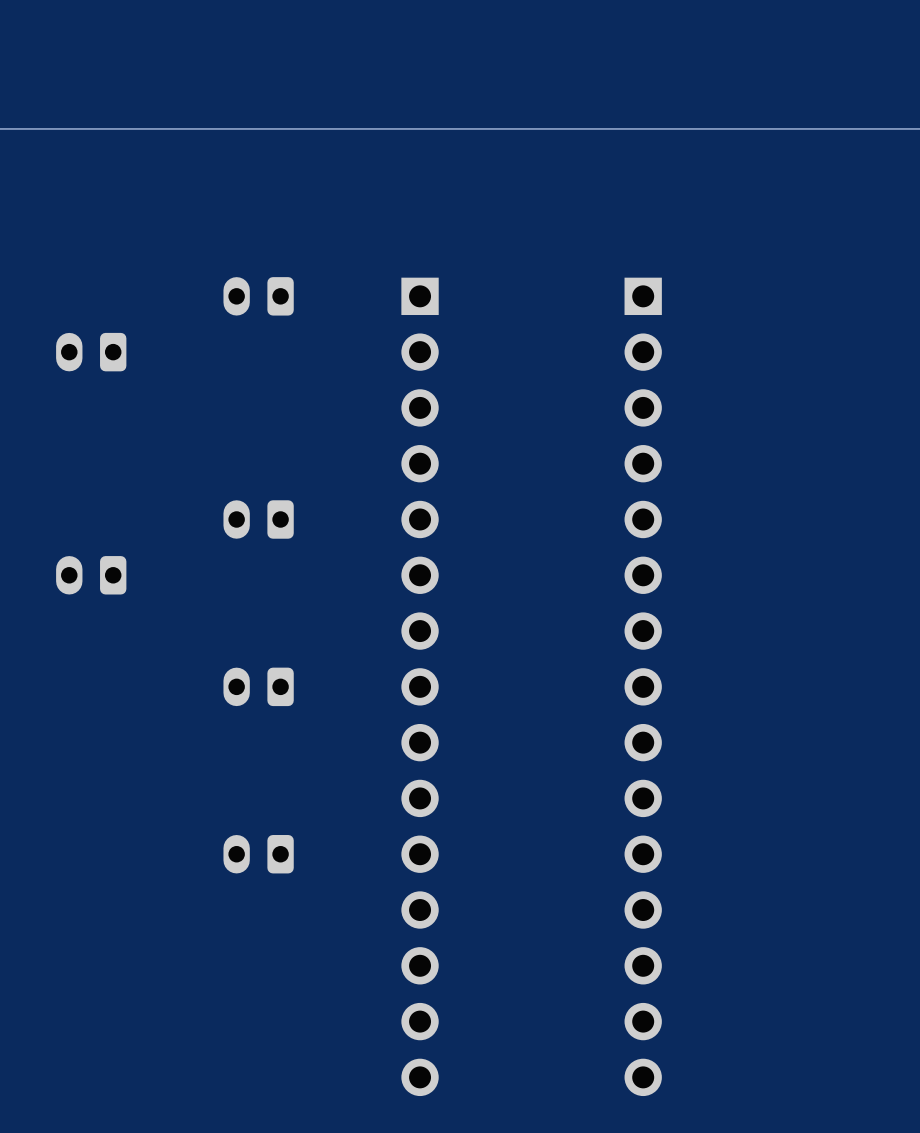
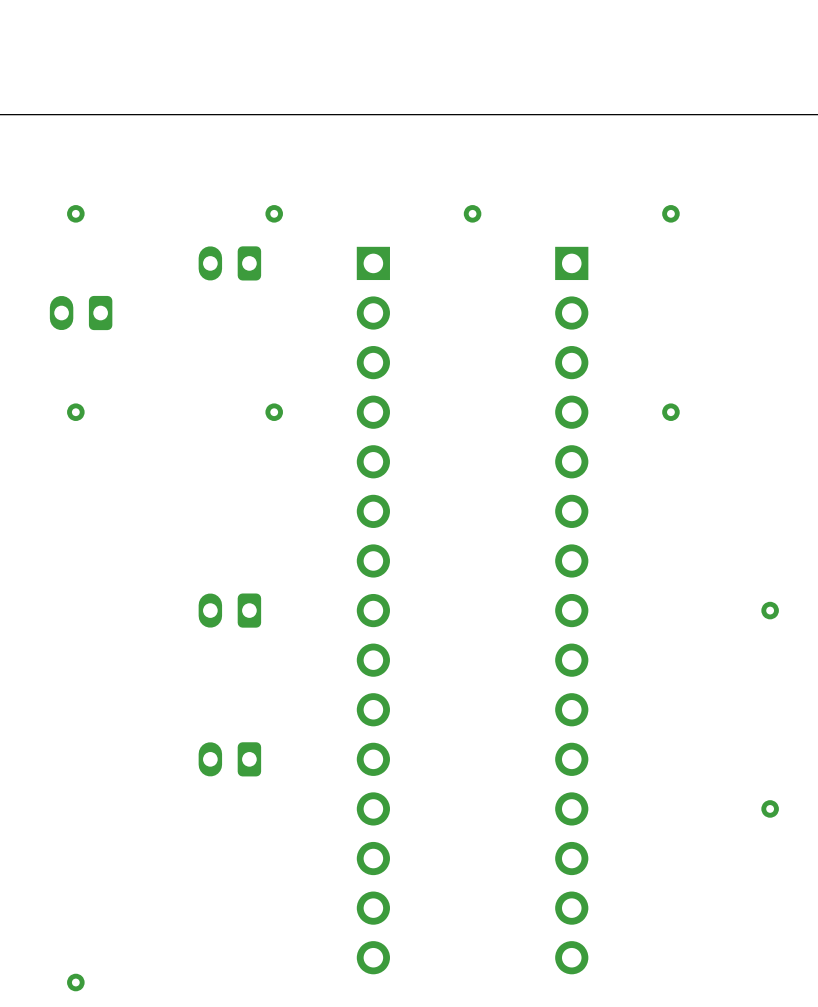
via: none -> (75, 213)
via: none -> (274, 213)
via: none -> (472, 213)
via: none -> (670, 213)
via: none -> (75, 412)
via: none -> (274, 412)
via: none -> (670, 412)
part: (258, 519) -> none
part: (91, 575) -> none
via: none -> (770, 610)
via: none -> (770, 808)
via: none -> (75, 982)

